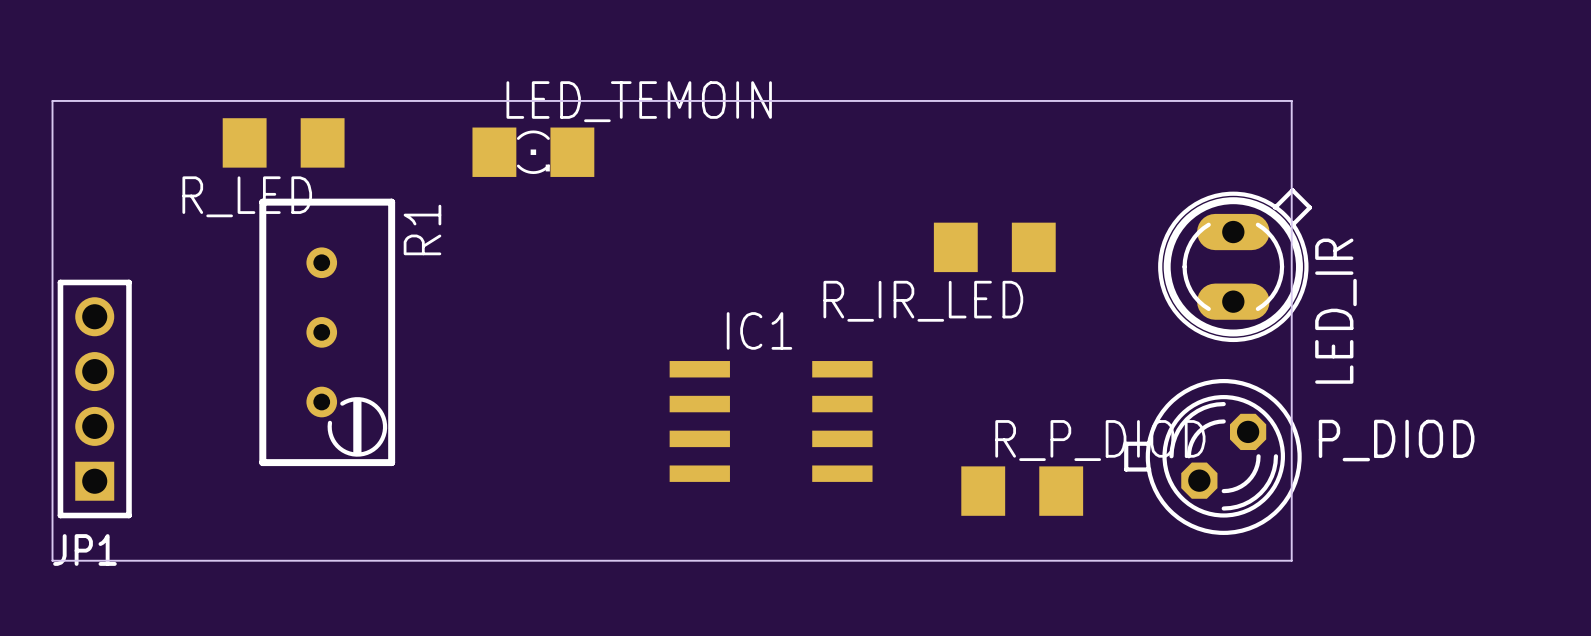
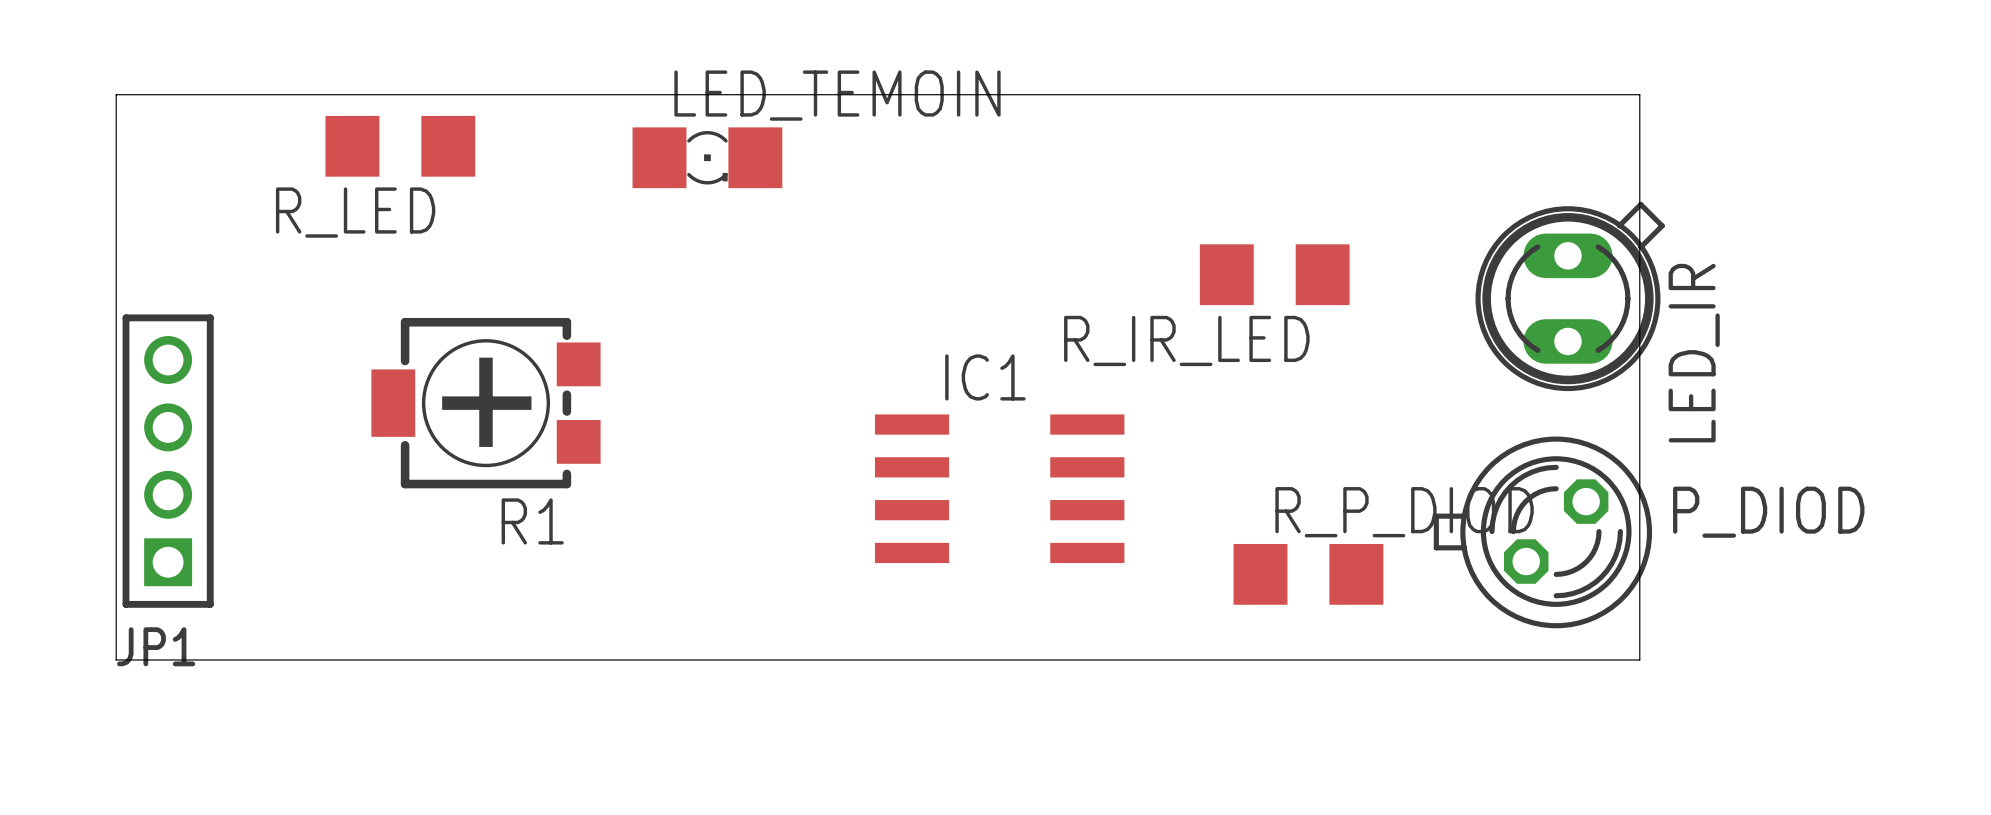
R1 footprint: [259, 198, 396, 467] -> [371, 317, 601, 489]
R1 name position: R1 (422, 229) -> R1 (532, 521)

